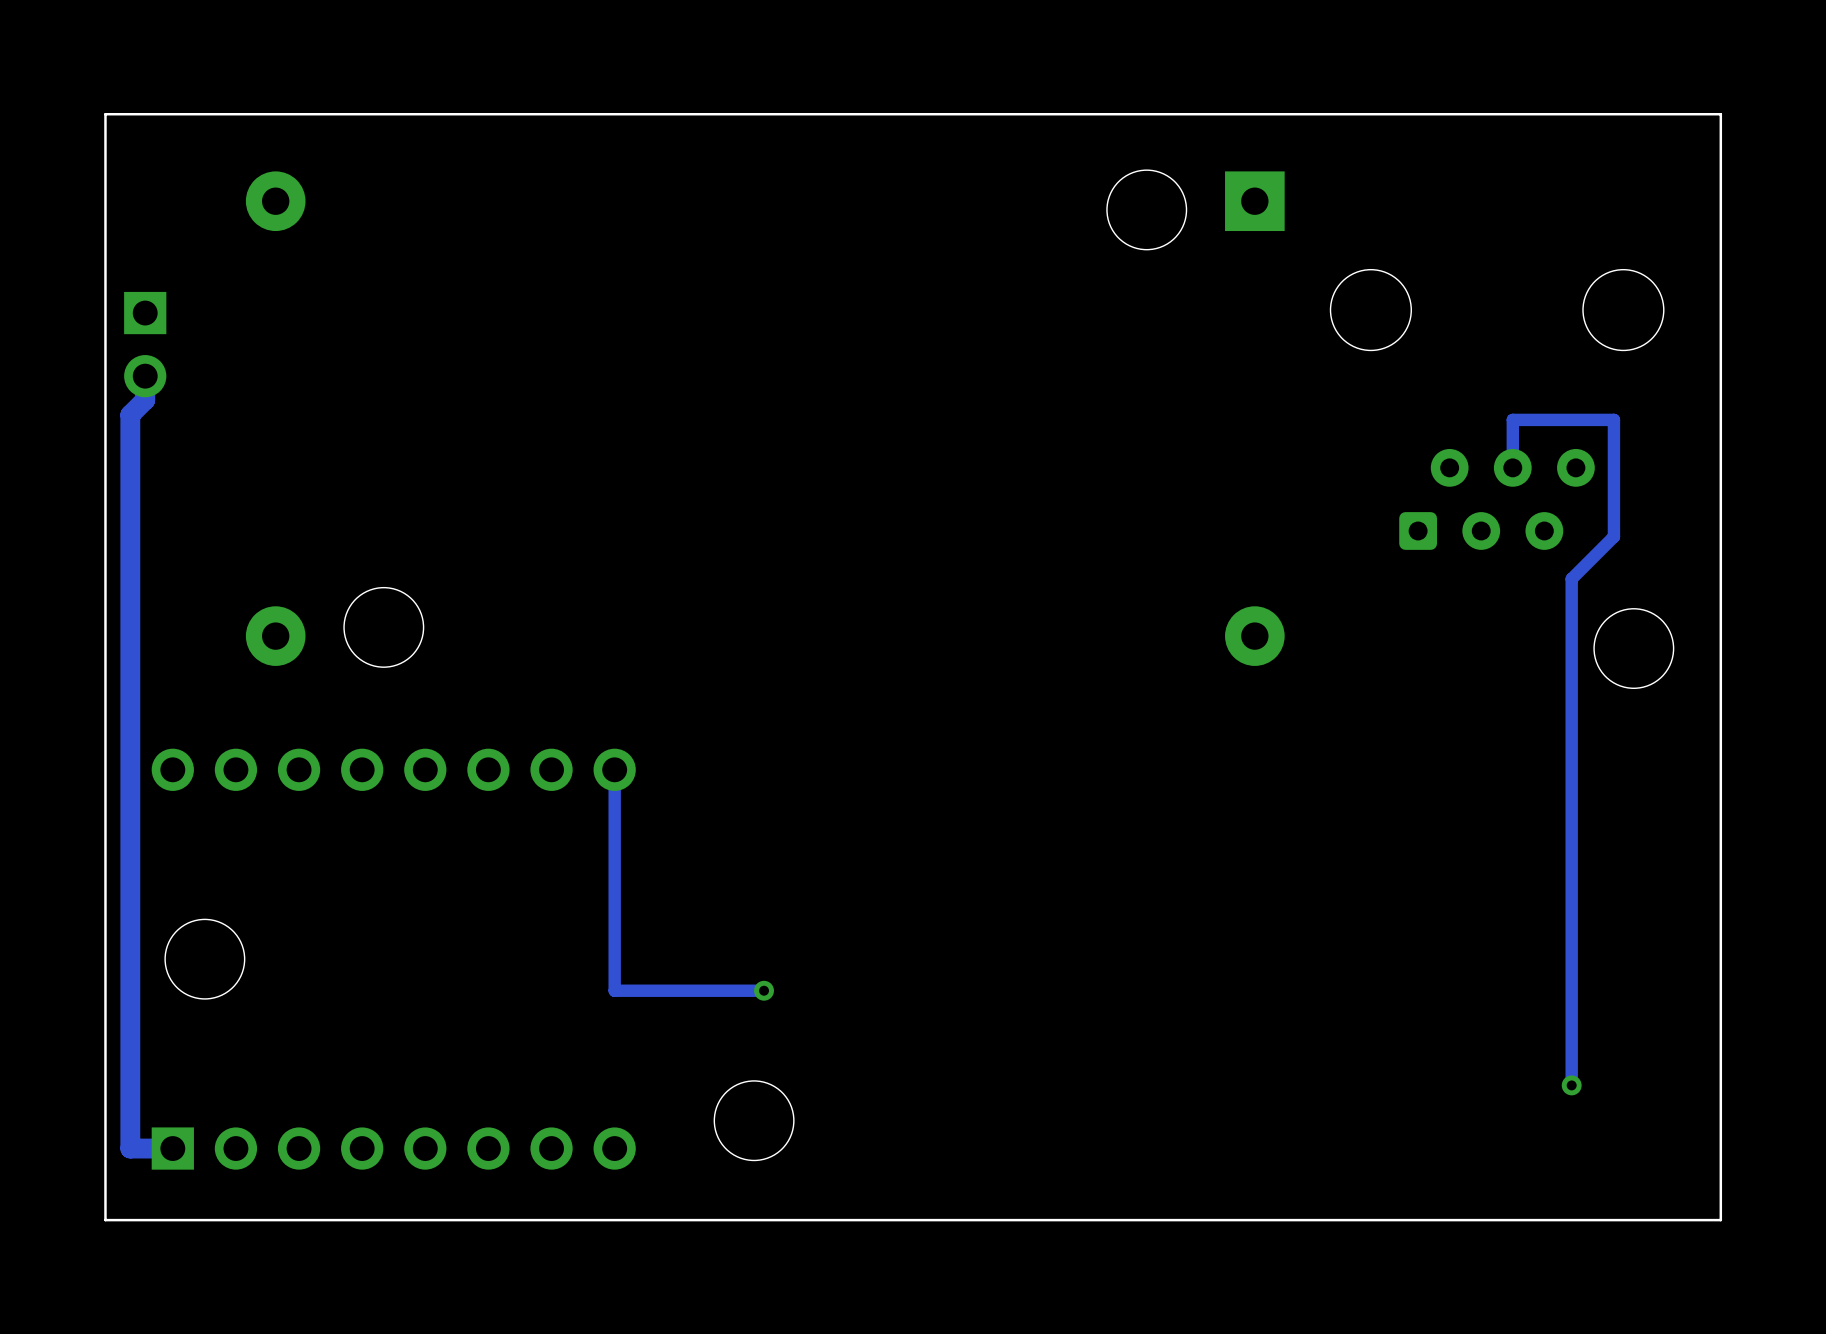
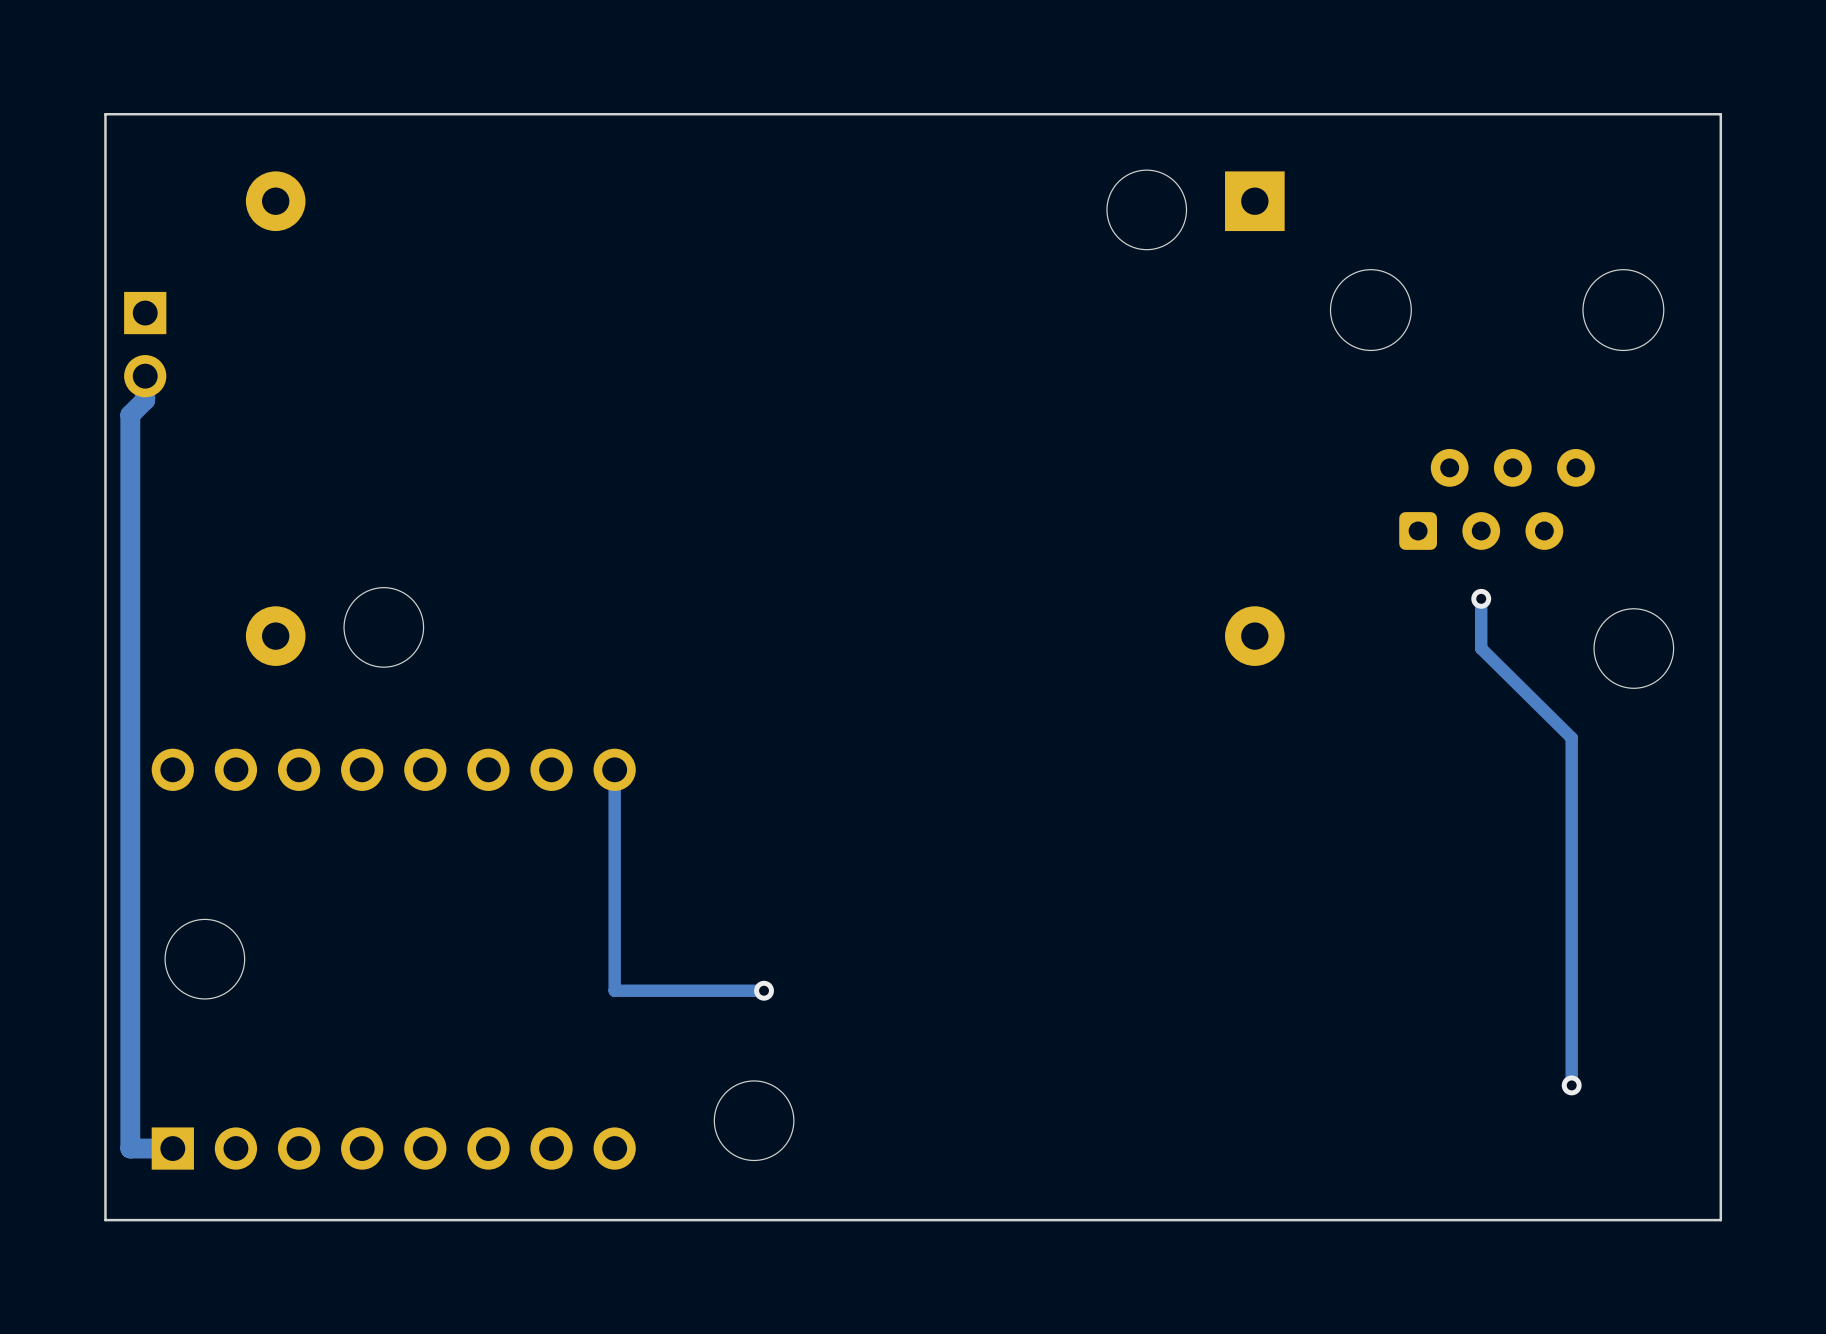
track: (1512, 467) (1512, 419) (1613, 419) (1613, 536) (1571, 578) (1571, 738) -> (1481, 598) (1481, 648) (1571, 738)
via: none -> (1481, 598)

